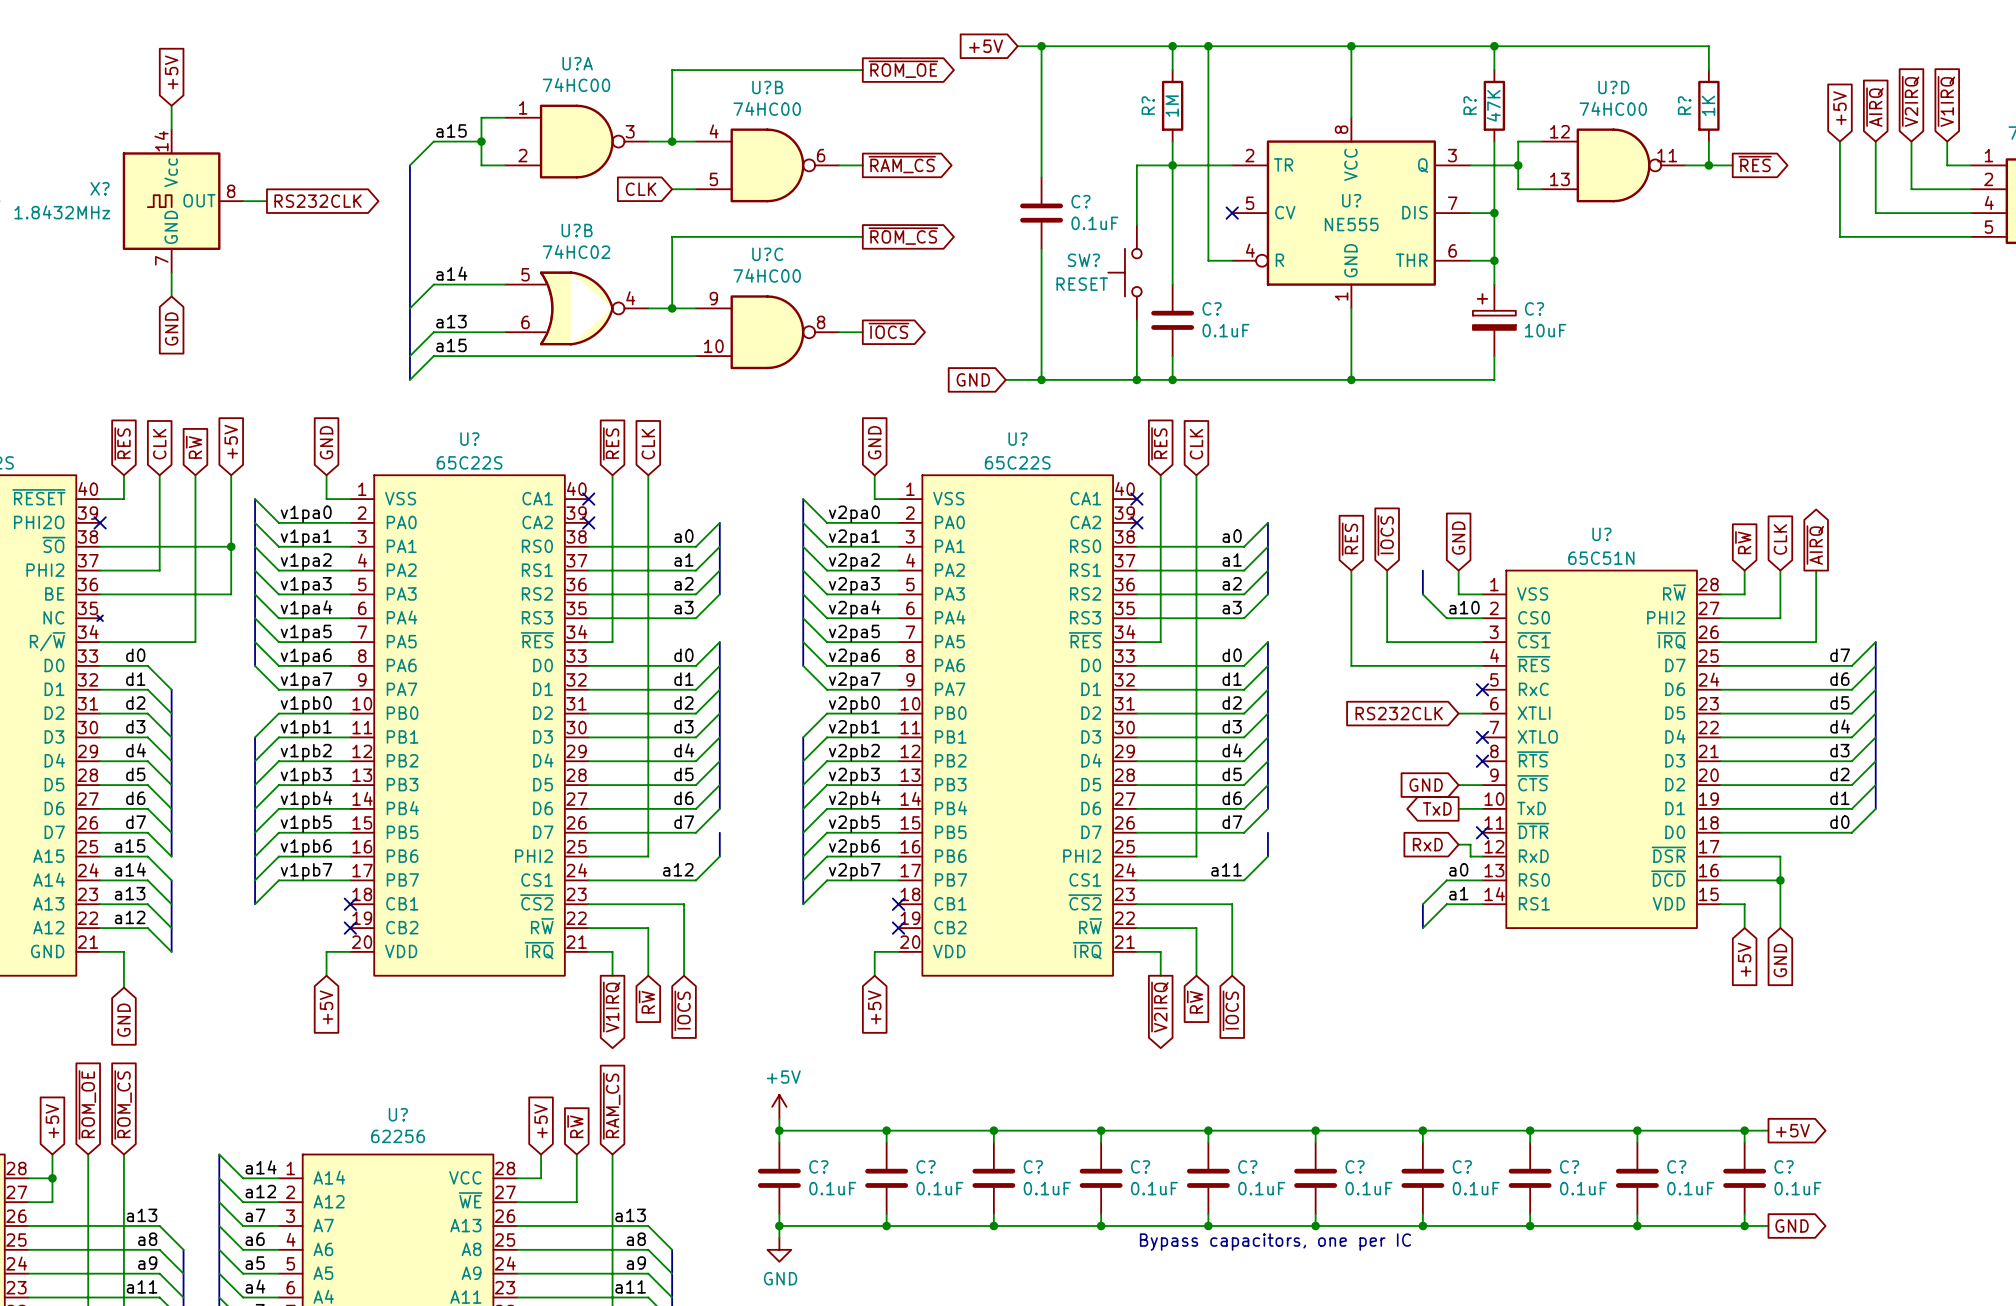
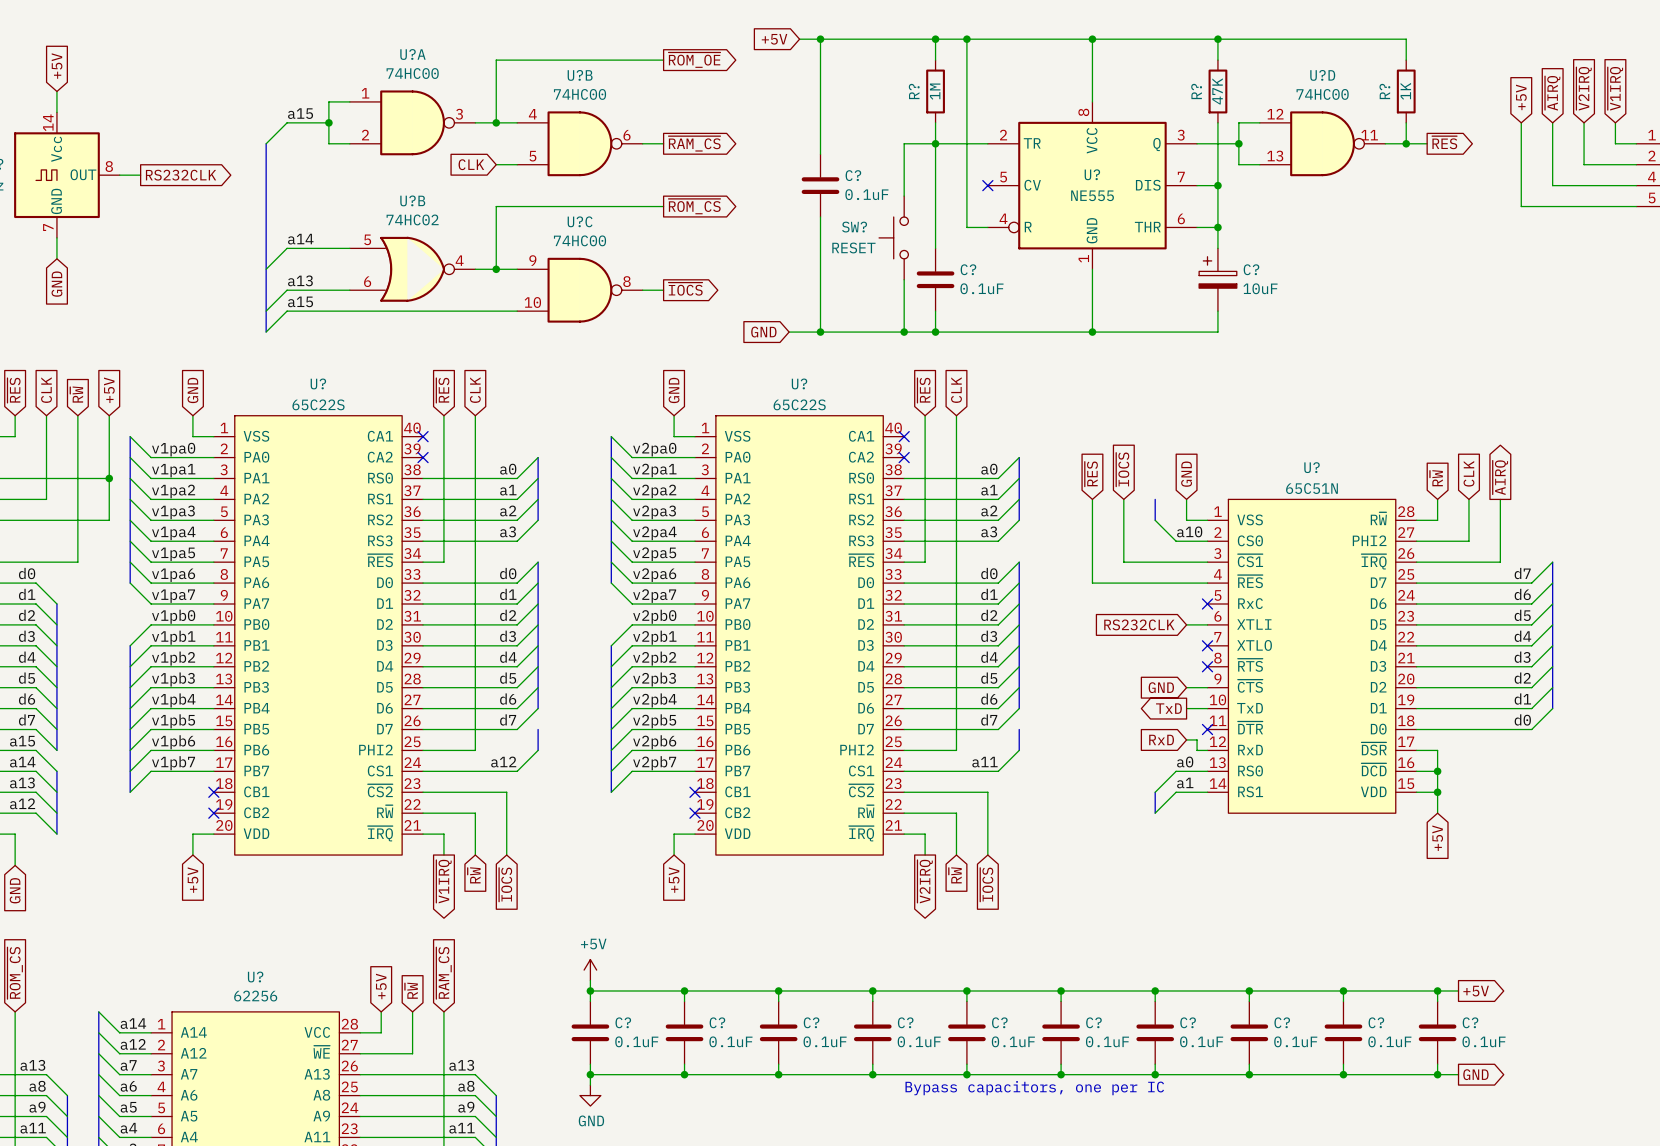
wire: (1744, 856) (1780, 856) (1780, 928) -> (1437, 750) (1437, 792)
wire: (1744, 880) (1780, 880) -> none
junction: none -> (1437, 771)
junction: (1780, 880) -> none
junction: none -> (1437, 792)
global label: GND (1780, 960) -> none

